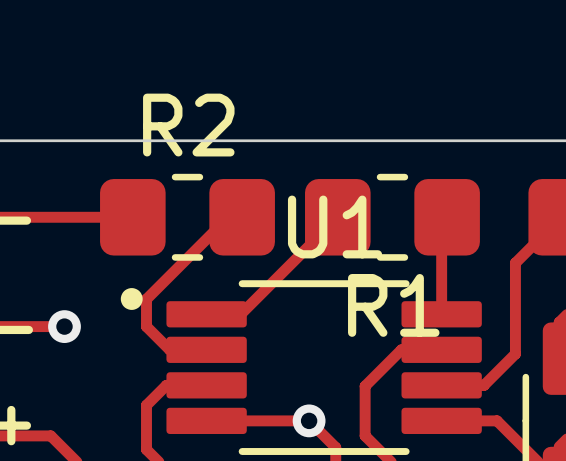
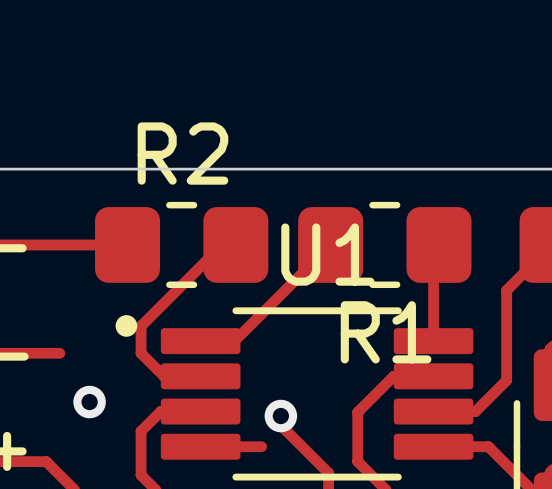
via position: (64, 326) -> (89, 402)
track: (268, 420) (309, 420) -> (280, 425) (302, 446)
via position: (309, 420) -> (280, 416)

